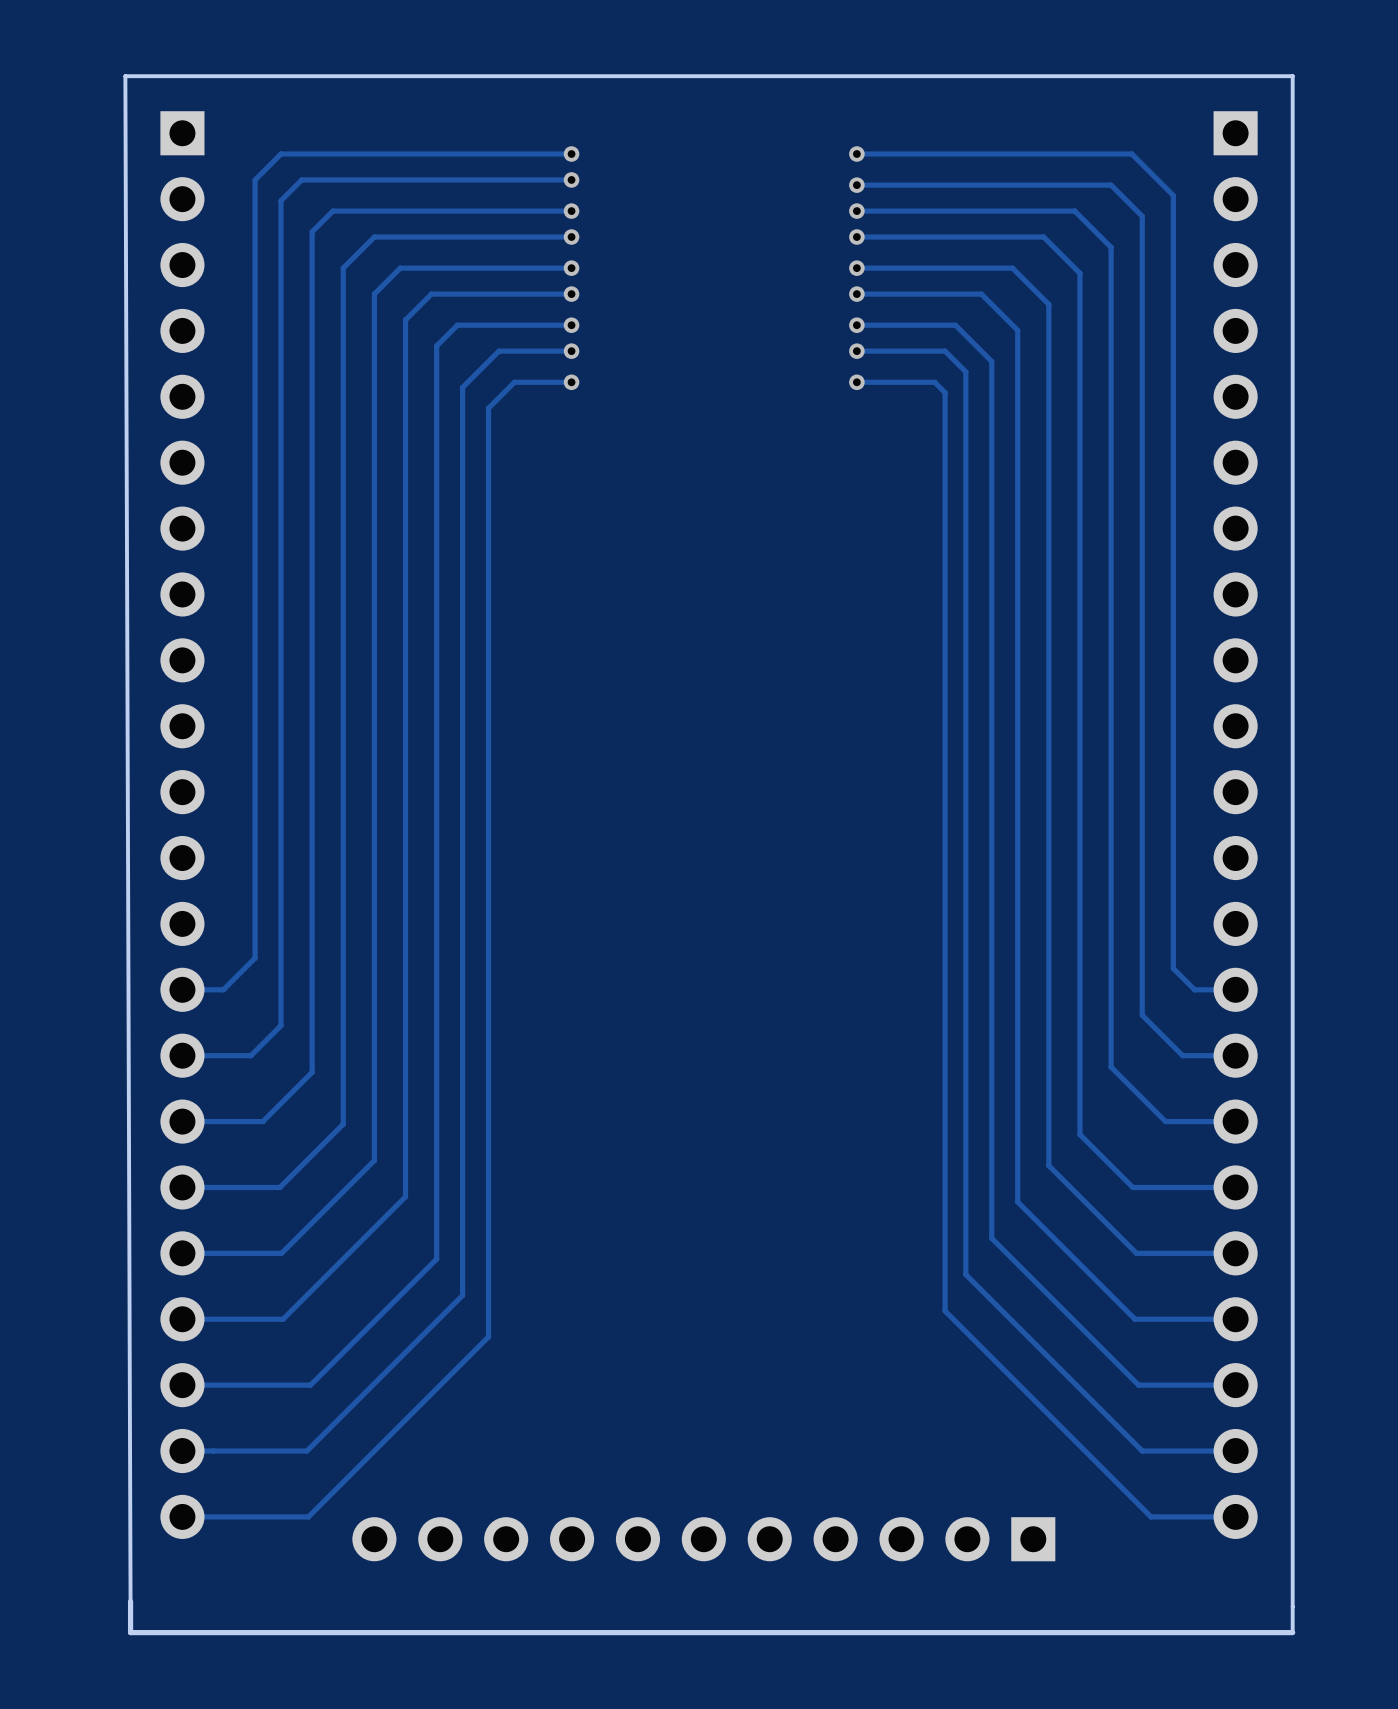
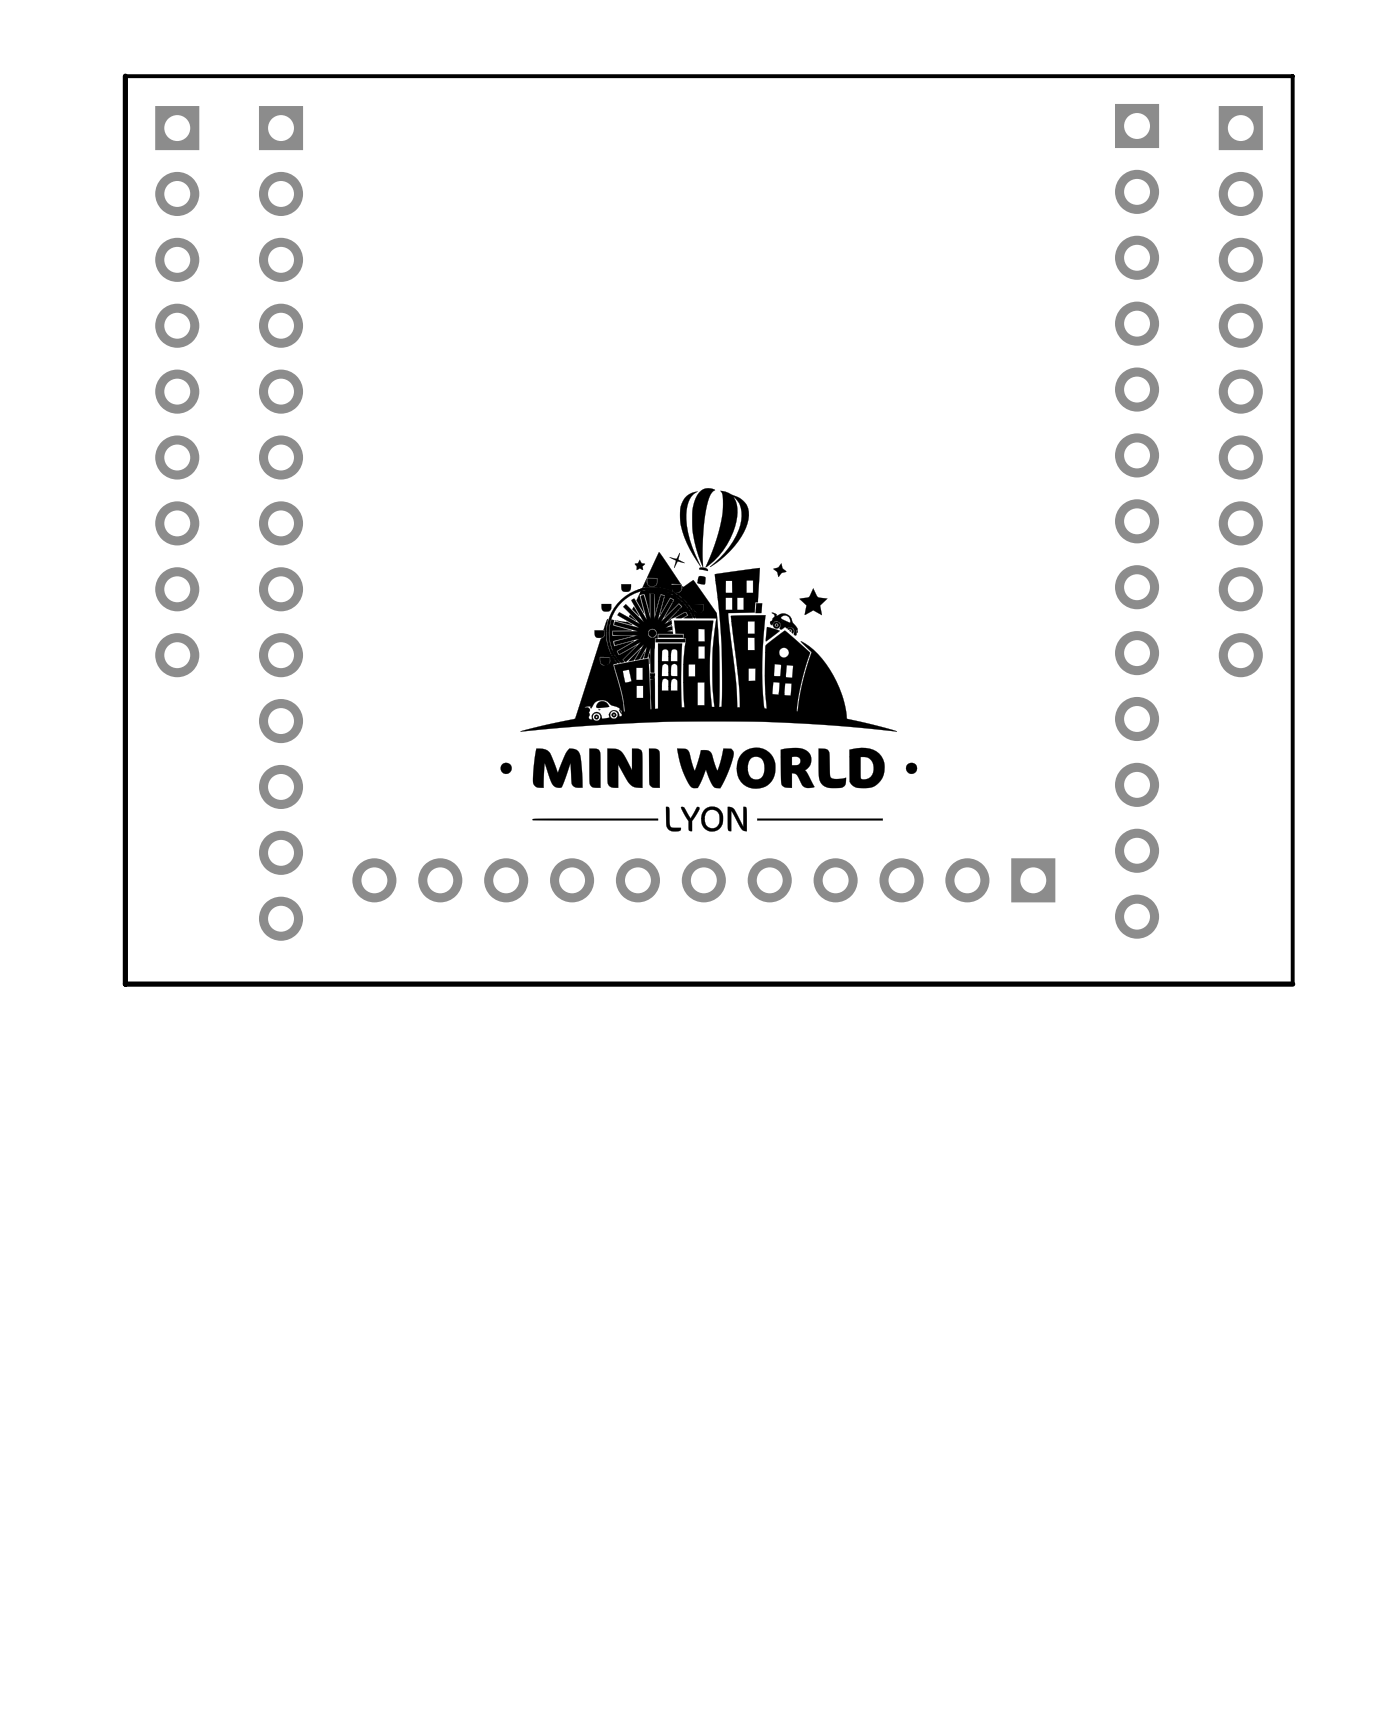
board edge: (125, 76) (130, 1632) (1292, 1632) (1292, 984) -> (125, 76) (125, 984) (1292, 984)
track: (571, 154) (281, 154) (255, 179) (255, 958) (223, 989) (182, 989) -> none
via: (571, 154) -> none
track: (856, 154) (1131, 154) (1173, 195) (1173, 968) (1194, 989) (1235, 989) -> none
via: (856, 154) -> none
track: (571, 179) (301, 179) (281, 200) (281, 1025) (250, 1055) (182, 1055) -> none
via: (571, 179) -> none
track: (856, 185) (1111, 185) (1142, 216) (1142, 1015) (1182, 1055) (1235, 1055) -> none
via: (856, 185) -> none
track: (571, 211) (332, 211) (312, 231) (312, 1072) (262, 1121) (182, 1121) -> none
via: (571, 211) -> none
track: (856, 211) (1074, 211) (1111, 247) (1111, 1067) (1165, 1121) (1235, 1121) -> none
via: (856, 211) -> none
track: (571, 237) (374, 237) (343, 268) (343, 1124) (279, 1187) (182, 1187) -> none
via: (571, 237) -> none
track: (856, 237) (1043, 237) (1079, 273) (1079, 1134) (1132, 1187) (1235, 1187) -> none
via: (856, 237) -> none
track: (571, 268) (400, 268) (374, 294) (374, 1160) (281, 1253) (182, 1253) -> none
via: (571, 268) -> none
track: (856, 268) (1012, 268) (1048, 304) (1048, 1165) (1136, 1253) (1235, 1253) -> none
via: (856, 268) -> none
track: (571, 294) (431, 294) (405, 320) (405, 1196) (283, 1319) (182, 1319) -> none
via: (571, 294) -> none
track: (856, 294) (981, 294) (1017, 330) (1017, 1202) (1134, 1319) (1235, 1319) -> none
via: (856, 294) -> none
track: (571, 325) (457, 325) (436, 345) (436, 1259) (310, 1385) (182, 1385) -> none
via: (571, 325) -> none
track: (856, 325) (955, 325) (991, 361) (991, 1238) (1138, 1385) (1235, 1385) -> none
via: (856, 325) -> none
track: (571, 351) (498, 351) (462, 387) (462, 1295) (306, 1451) (182, 1451) -> none
via: (571, 351) -> none
track: (856, 351) (945, 351) (965, 371) (965, 1274) (1142, 1451) (1235, 1451) -> none
via: (856, 351) -> none
track: (571, 382) (514, 382) (488, 408) (488, 1336) (308, 1516) (182, 1516) -> none
via: (571, 382) -> none
track: (856, 382) (934, 382) (945, 392) (945, 1310) (1151, 1516) (1235, 1516) -> none
via: (856, 382) -> none
part: none -> (177, 391)
part: none -> (1240, 391)
drawing: none -> [500, 488, 918, 832]
part: none -> (1137, 521)
part: none -> (281, 523)
part: (182, 825) -> none
part: (1235, 825) -> none
part: none -> (703, 880)
part: (703, 1539) -> none

